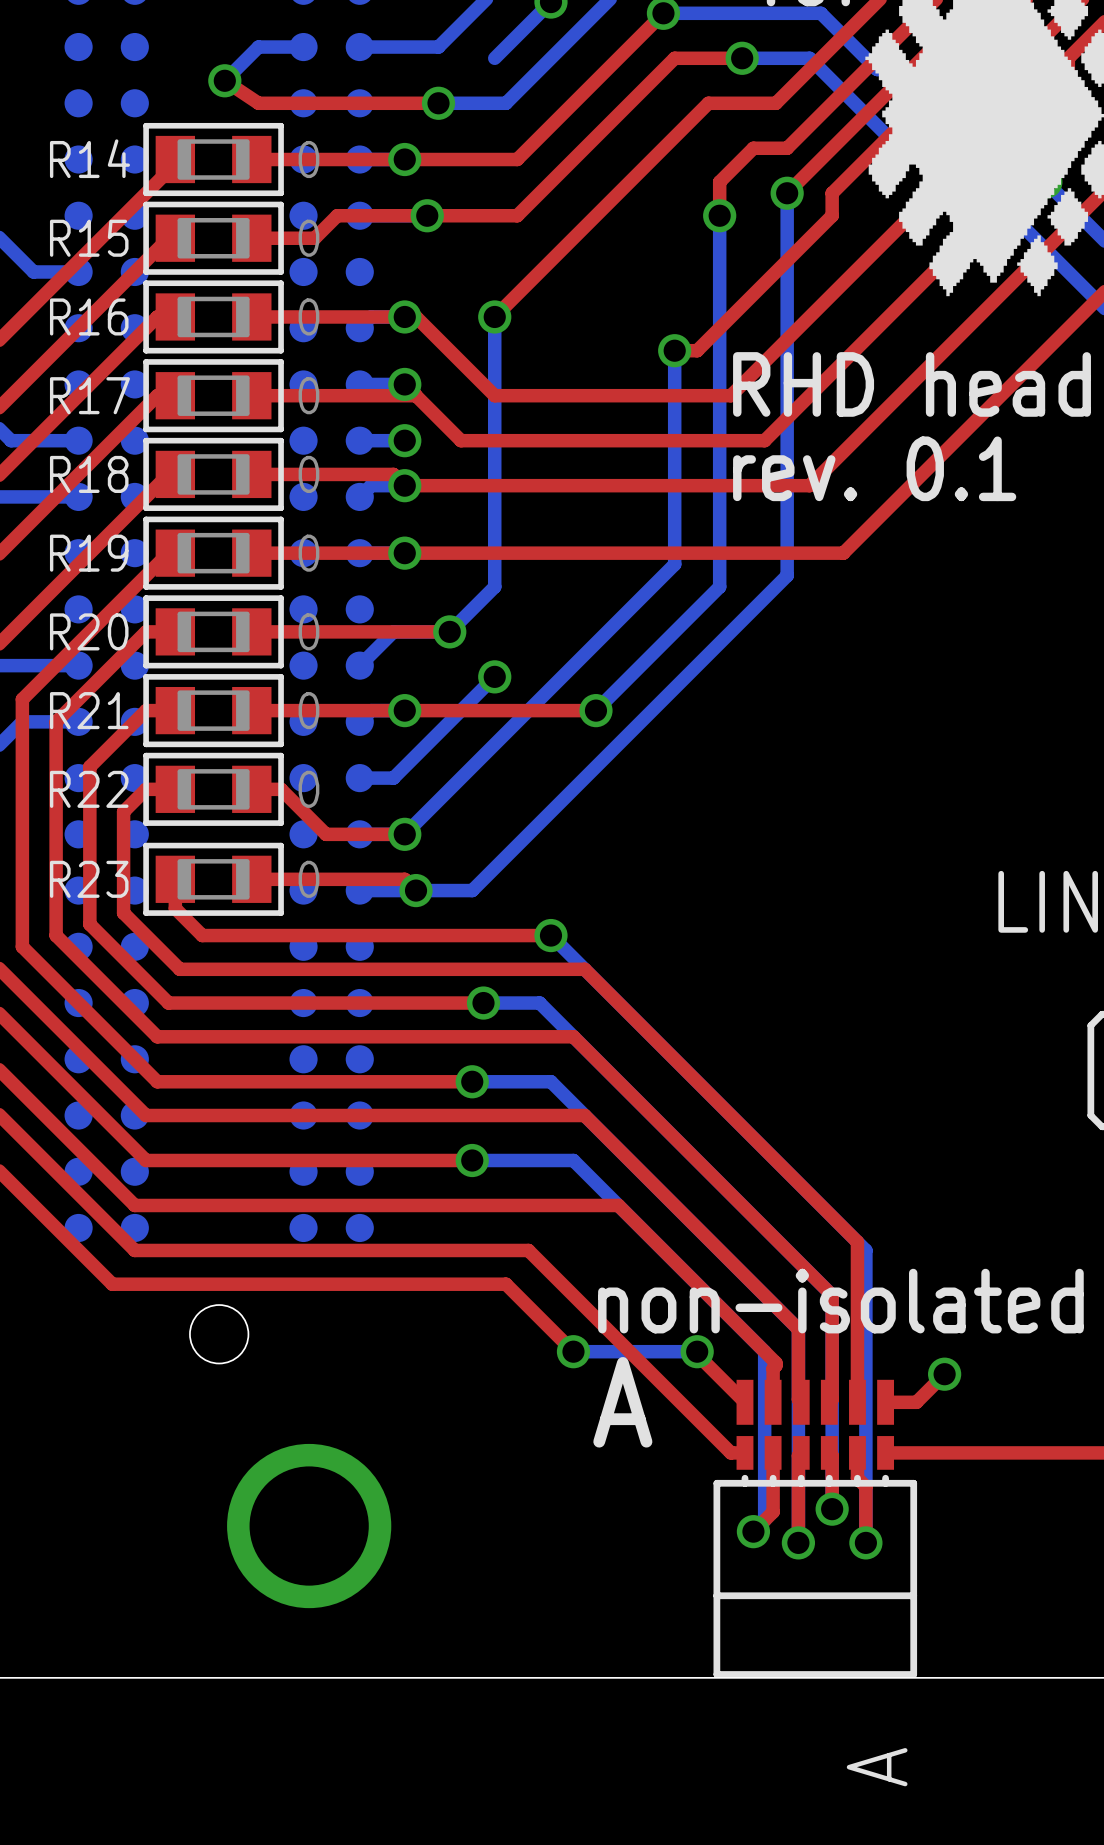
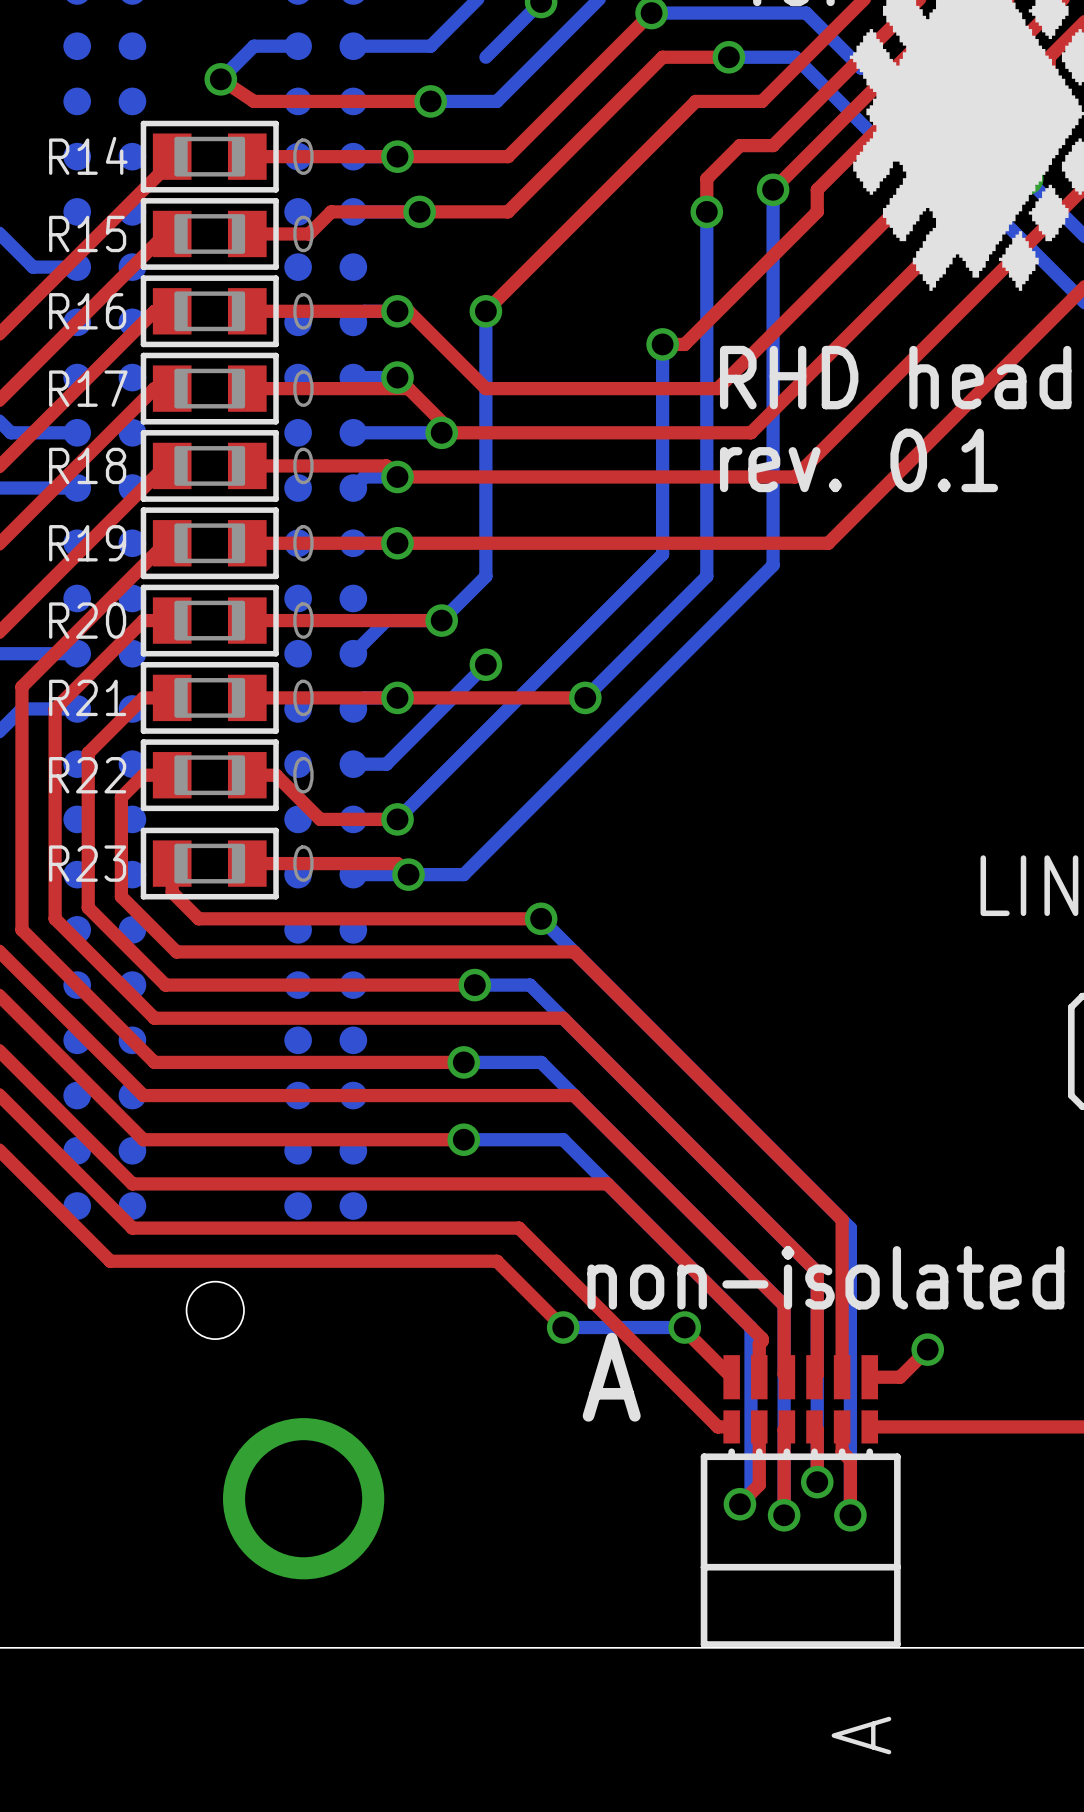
bottom track: none -> (397, 432) (441, 432)
via position: (404, 440) -> (441, 432)

